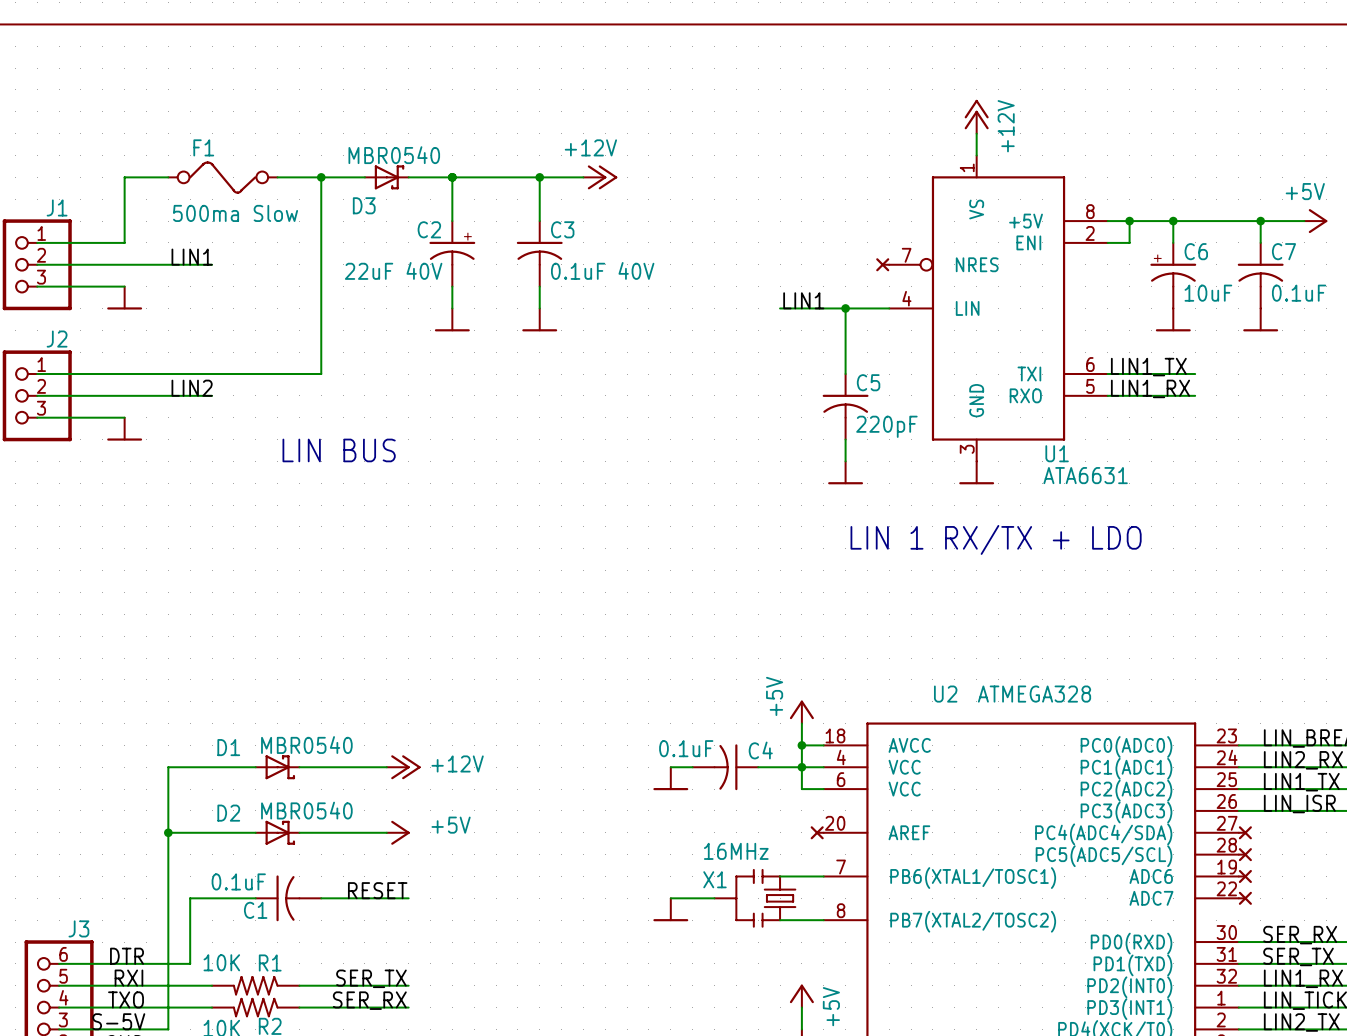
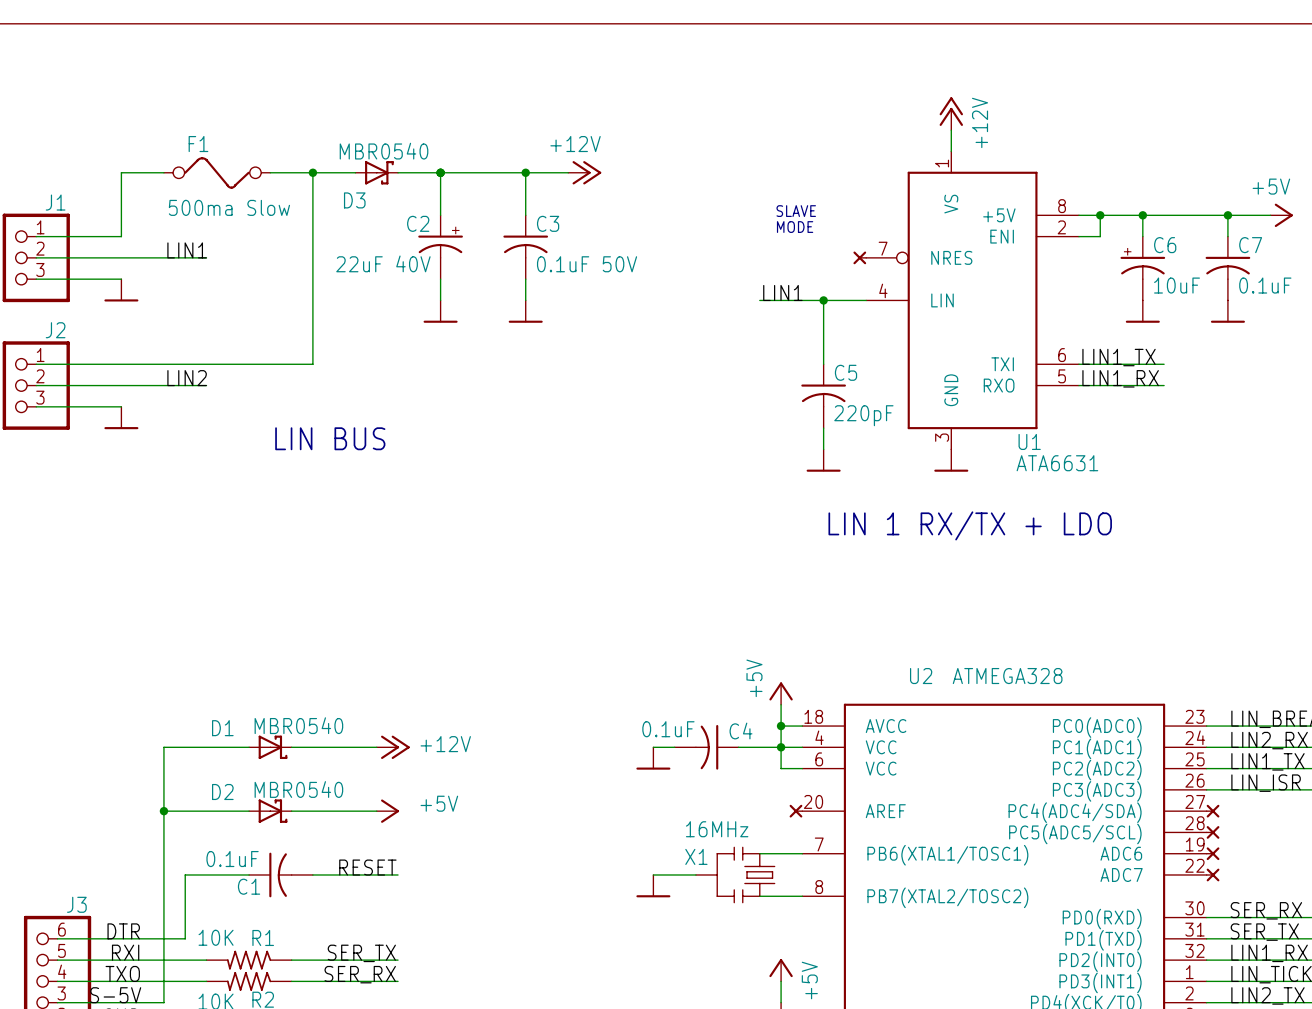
text: none -> SLAVE (796, 211)
text: none -> MODE (795, 227)
C3 value: 0.1uF 40V (602, 270) -> 0.1uF 50V (587, 264)

